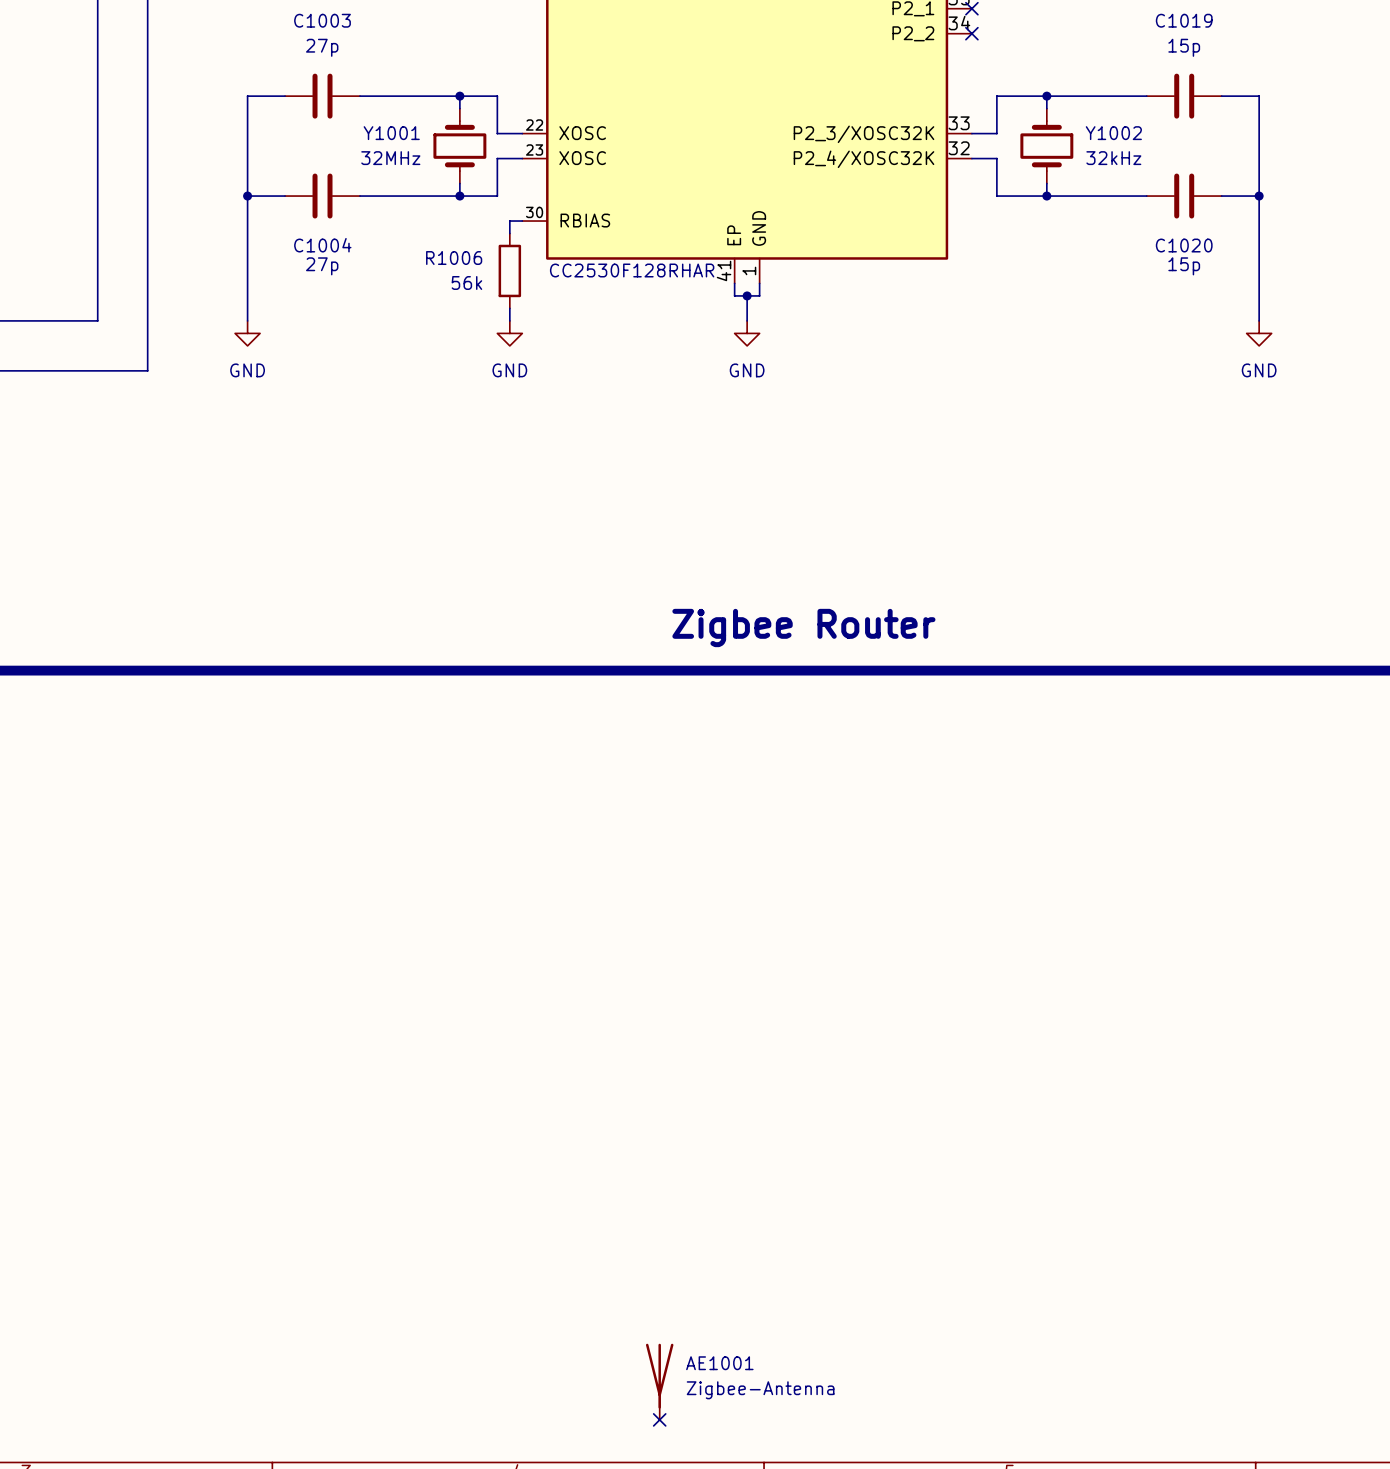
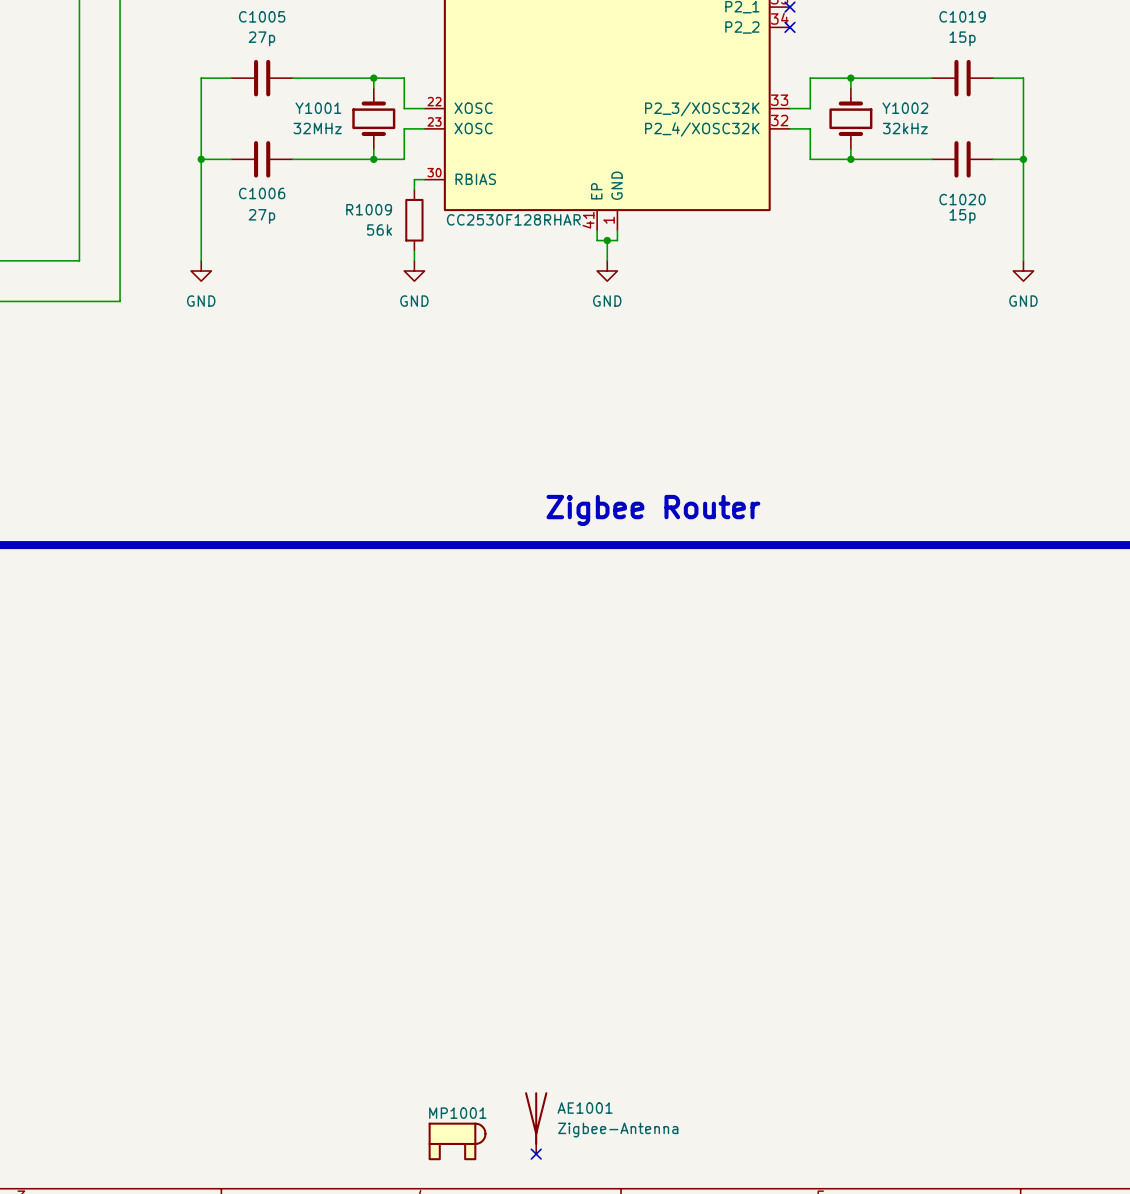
C1003 name: C1003 (322, 20) -> C1005 (262, 16)
C1004 name: C1004 (322, 245) -> C1006 (262, 193)
R1006 name: R1006 (454, 258) -> R1009 (369, 209)
MP1001: none -> (457, 1141)

